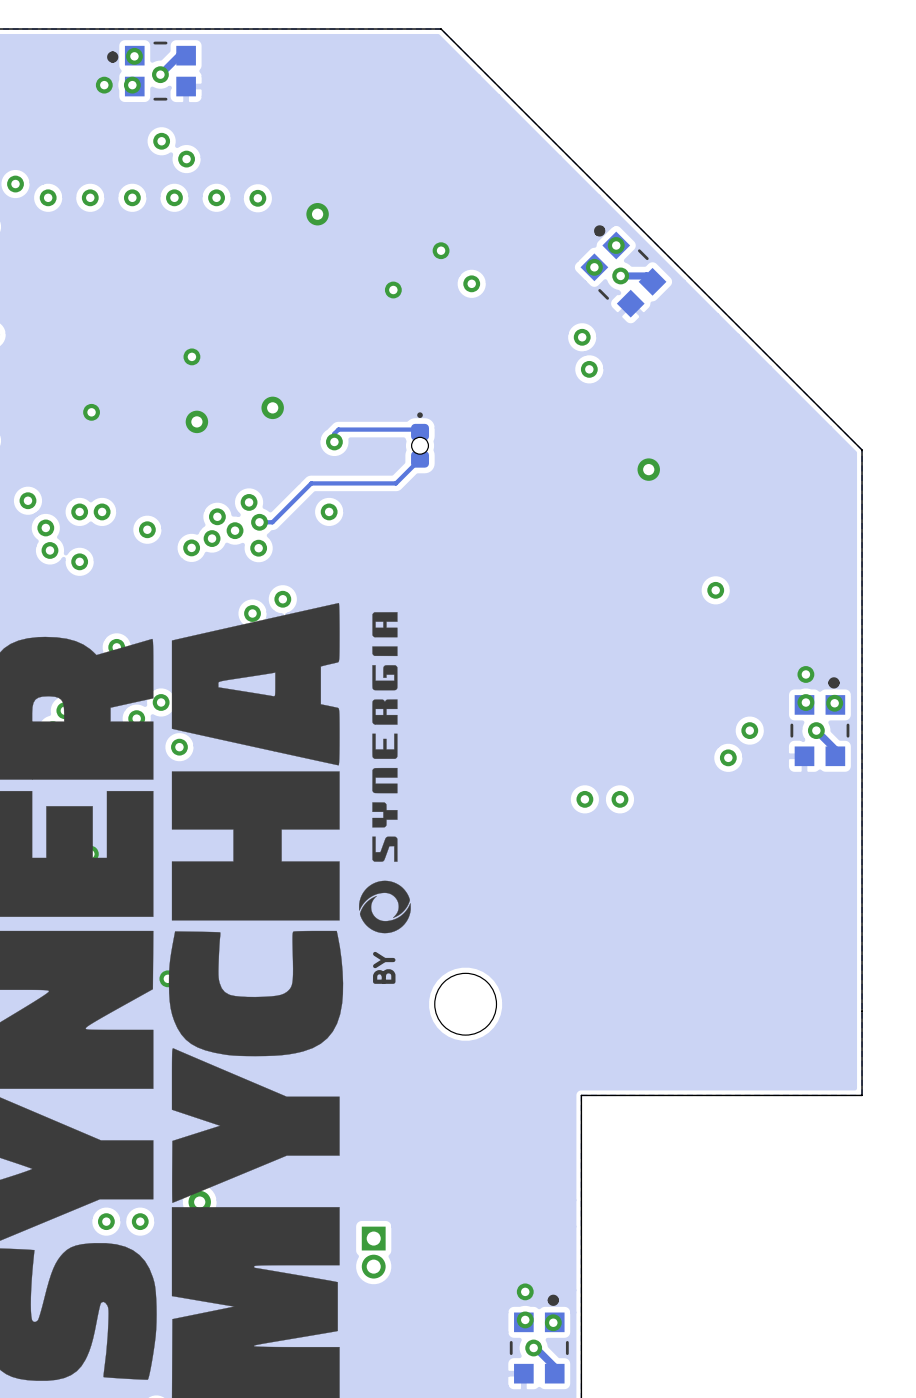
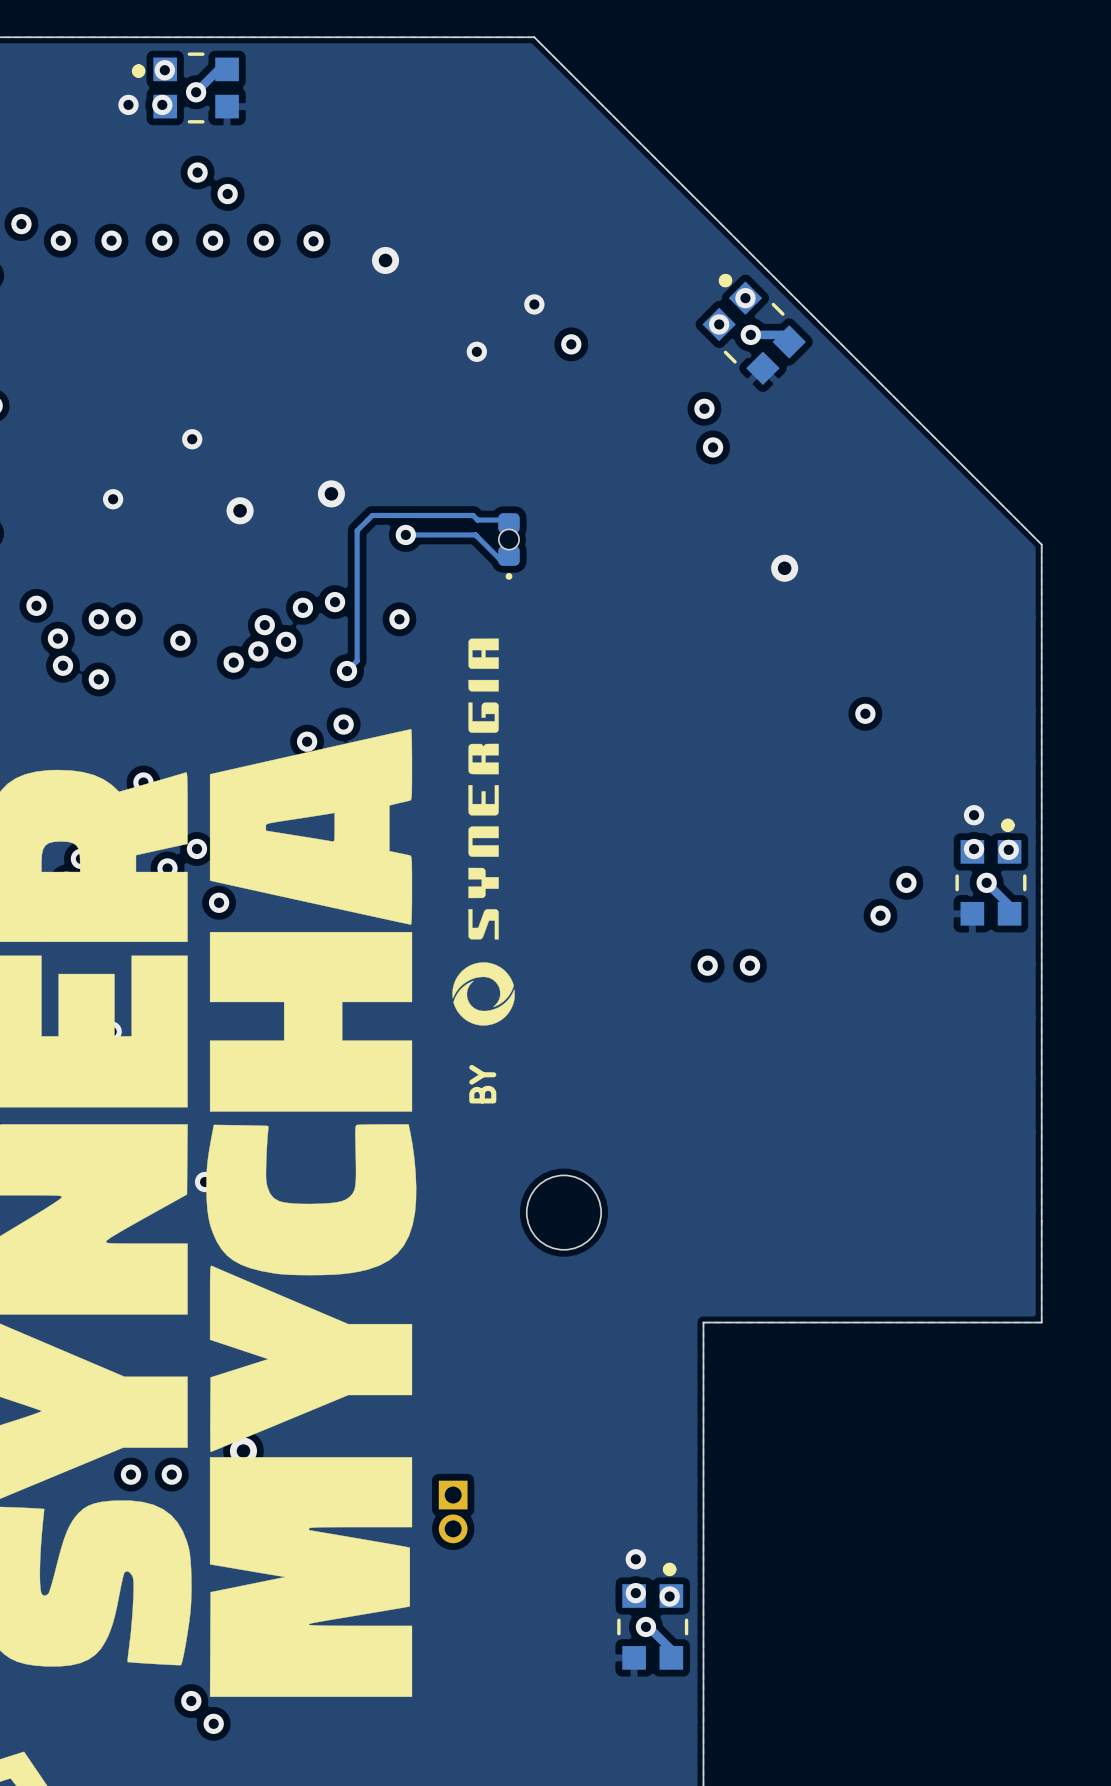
via position: (191, 356) -> (192, 439)
track: (393, 429) (338, 429) (334, 433) (334, 441) -> (508, 559) (499, 559) (475, 534) (405, 534)
track: none -> (477, 520) (473, 515) (372, 515) (357, 530) (357, 660) (347, 671)
part rotation: 0° (420, 440) -> 180° (508, 546)
track: (417, 461) (395, 483) (311, 483) (272, 522) (259, 522) -> none
via: none -> (335, 602)
via: (259, 522) -> none
via: (258, 548) -> none
via: none -> (347, 671)
drawing position: (384, 772) -> (483, 832)
text position: BY (384, 967) -> BY (482, 1084)

